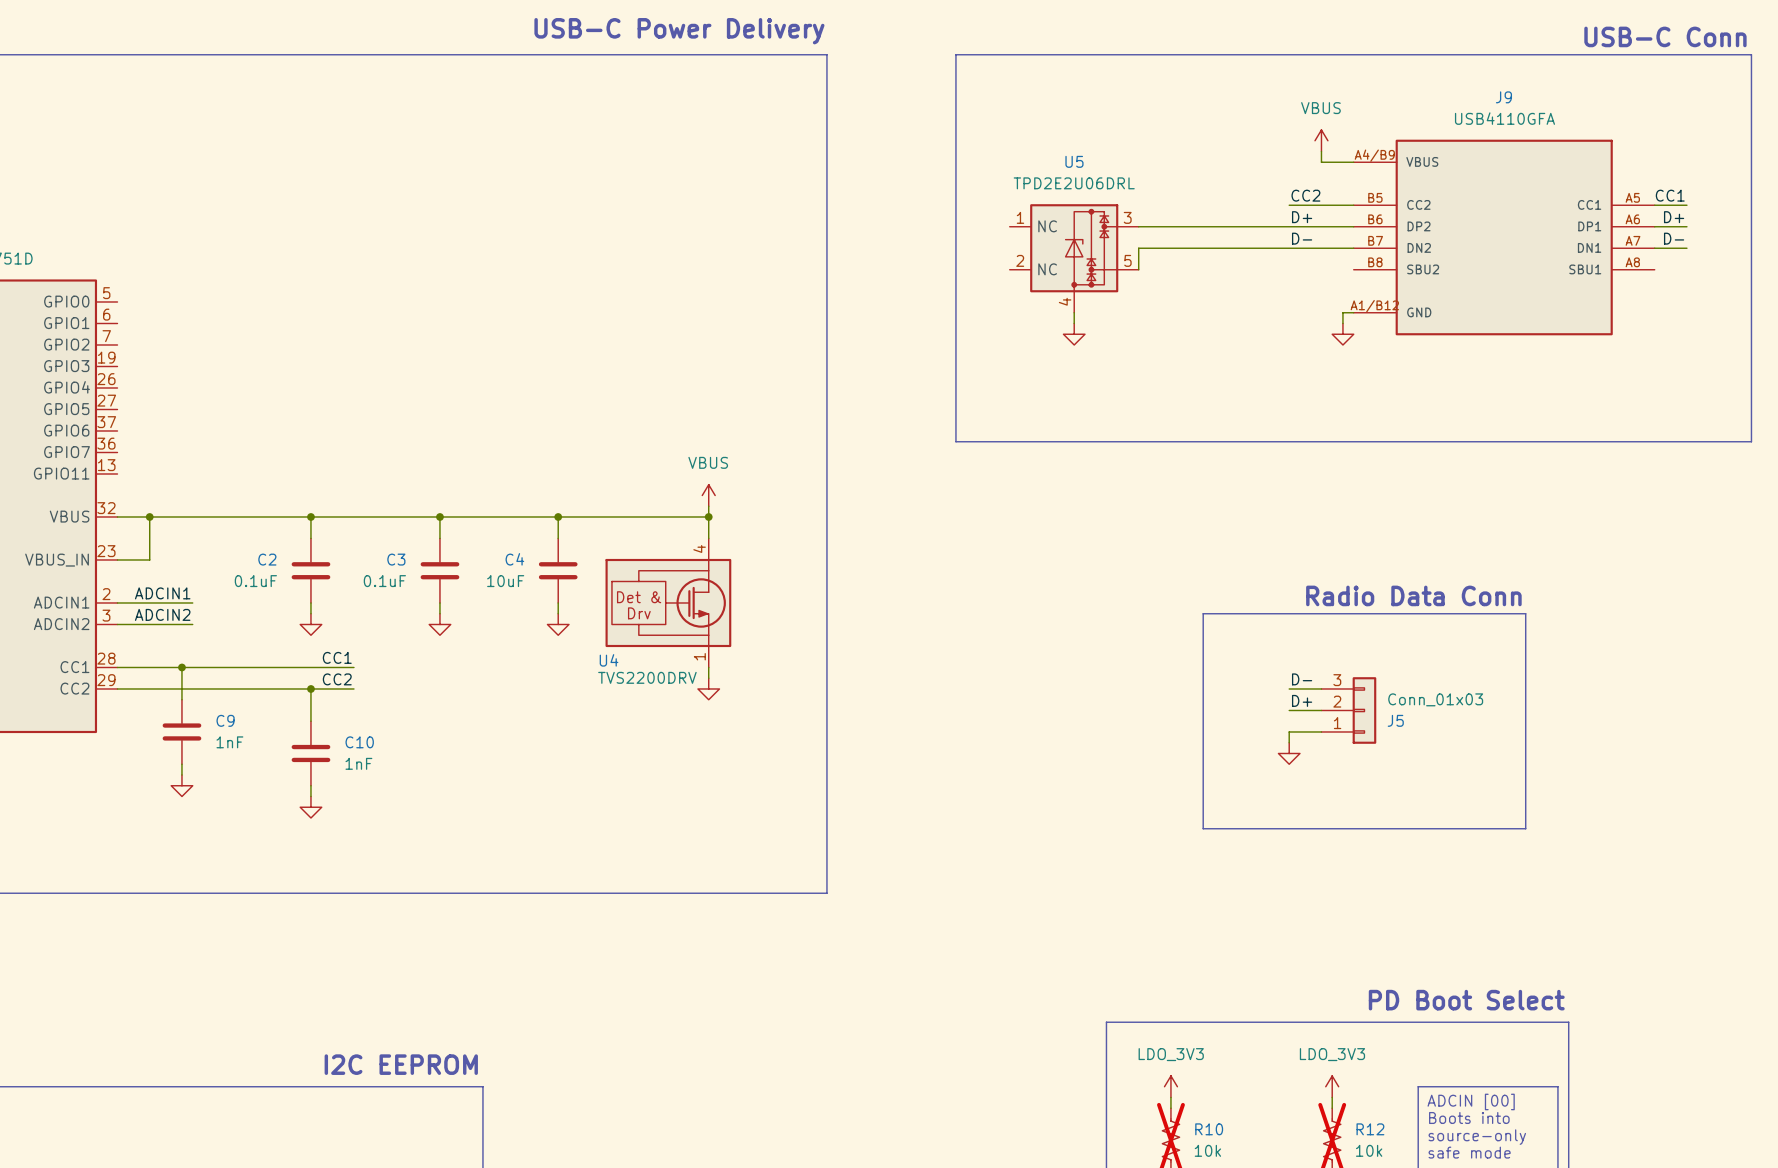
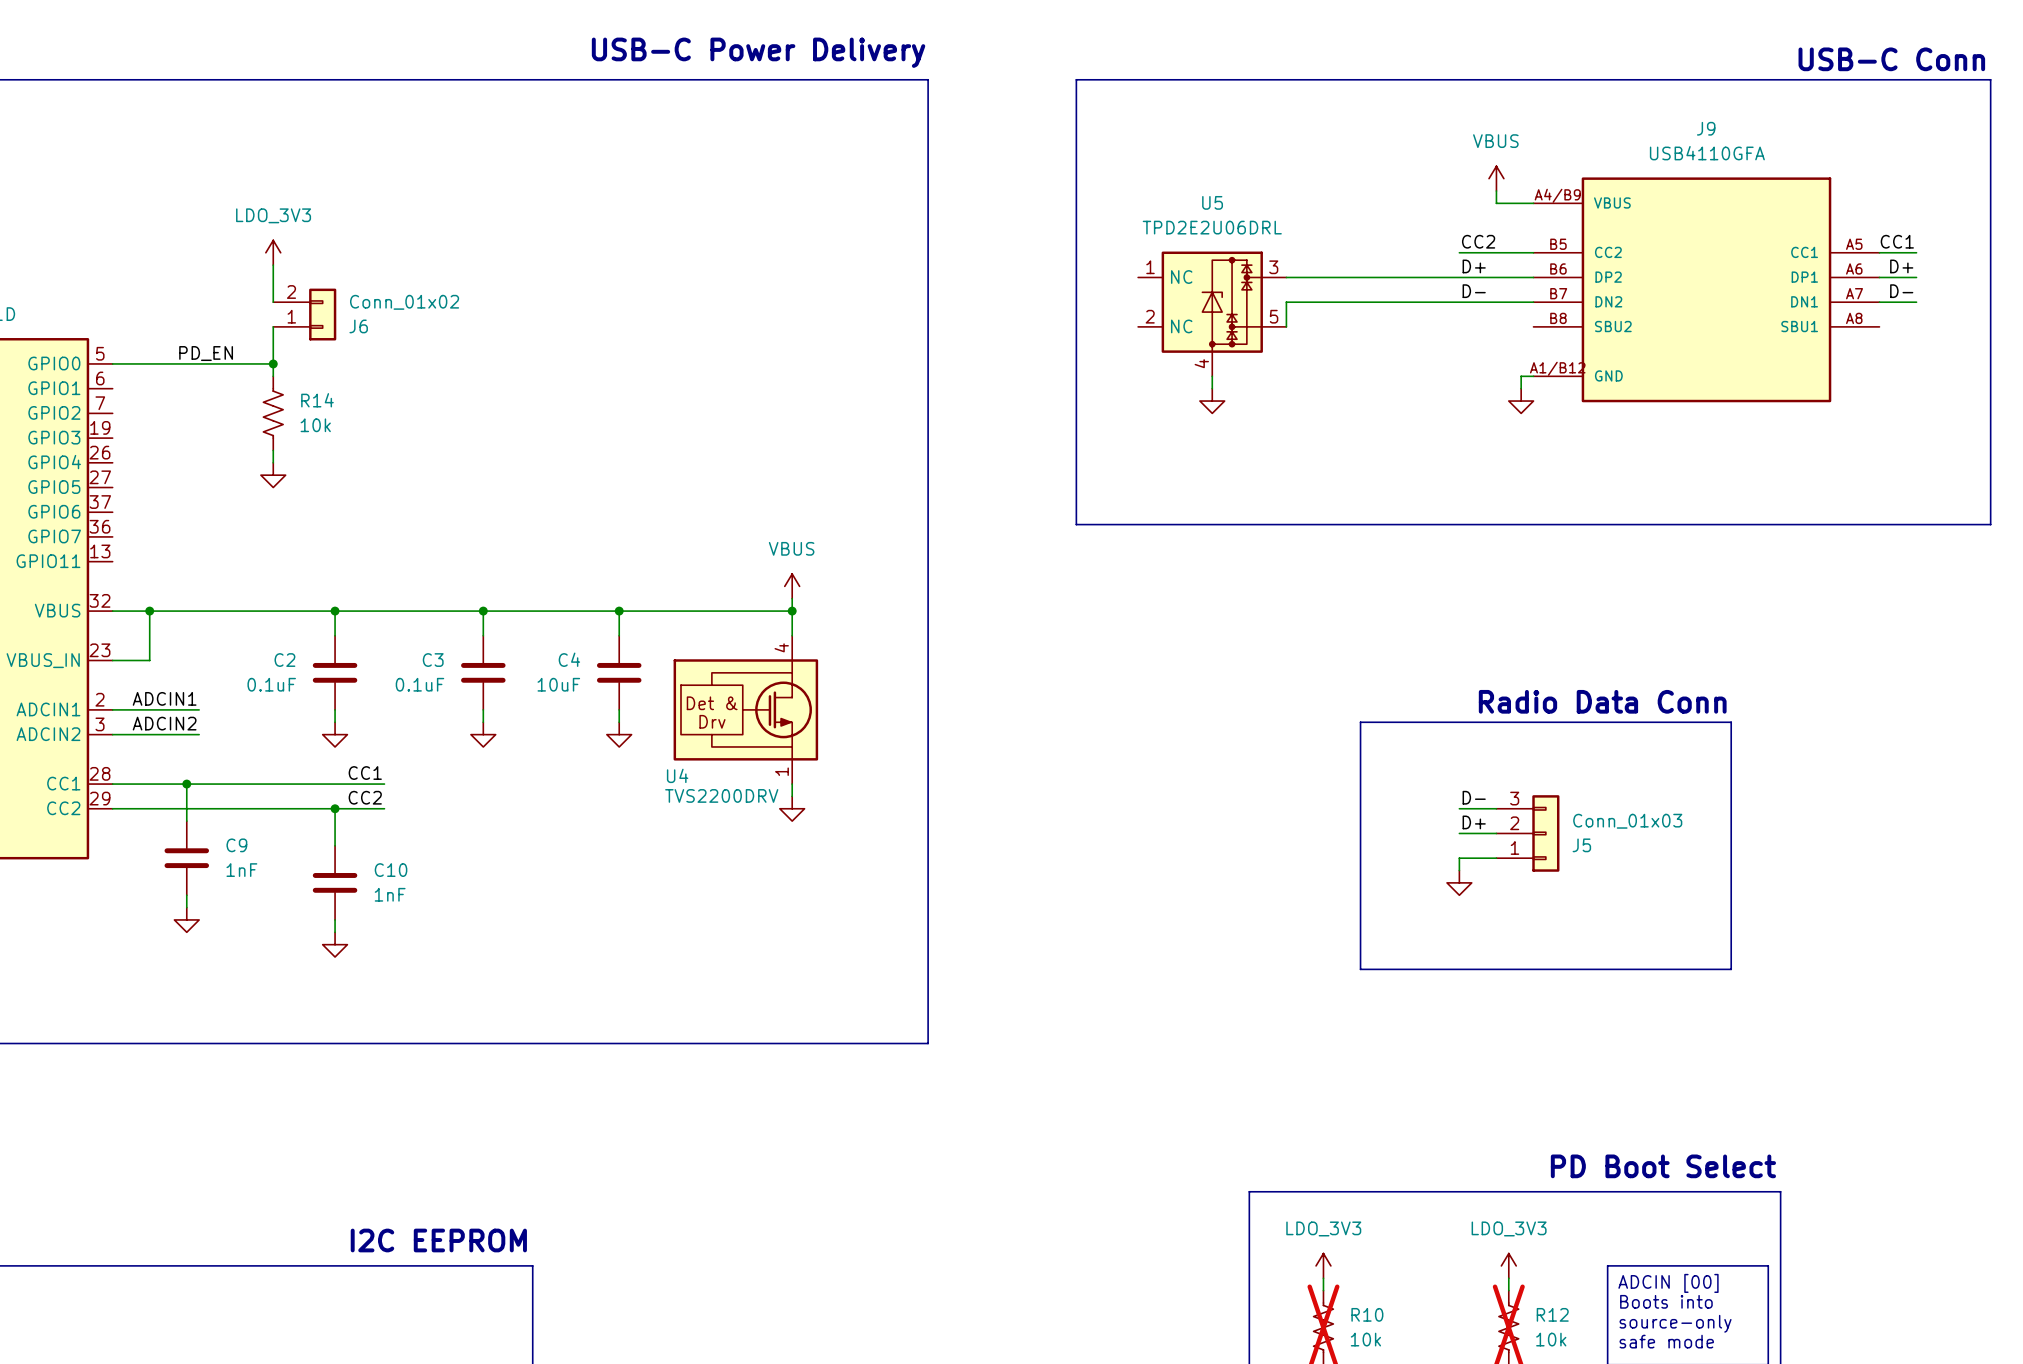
power symbol: none -> LDO_3V3 (273, 252)
wire: none -> (273, 265) (273, 302)
J6: none -> Conn_01x02 (304, 314)
wire: none -> (273, 326) (273, 376)
label: none -> PD_EN (206, 353)
wire: none -> (112, 363) (273, 363)
junction: none -> (273, 363)
R14: none -> 10k (273, 413)
wire: none -> (273, 450) (273, 462)
power symbol: none -> (273, 475)

